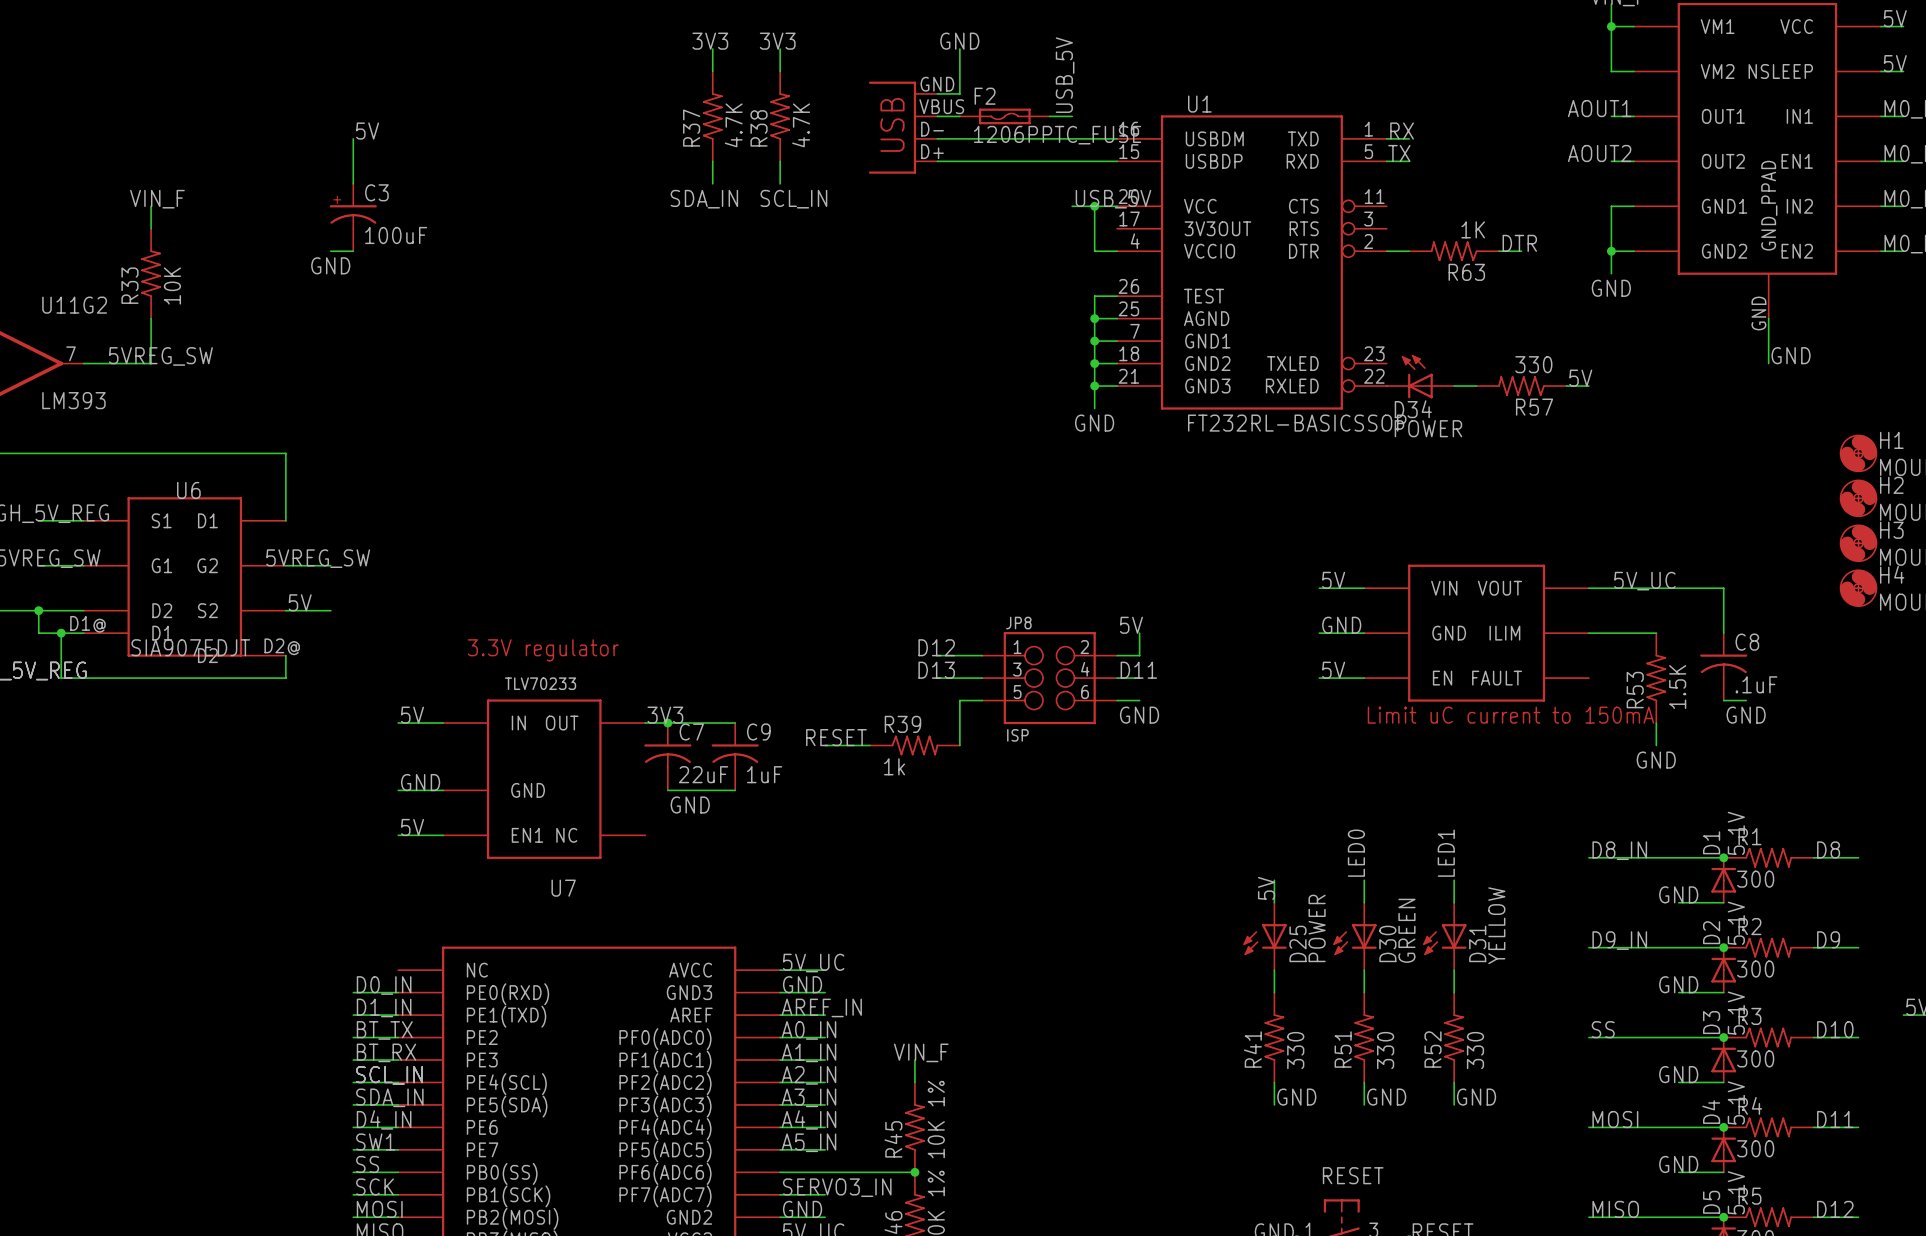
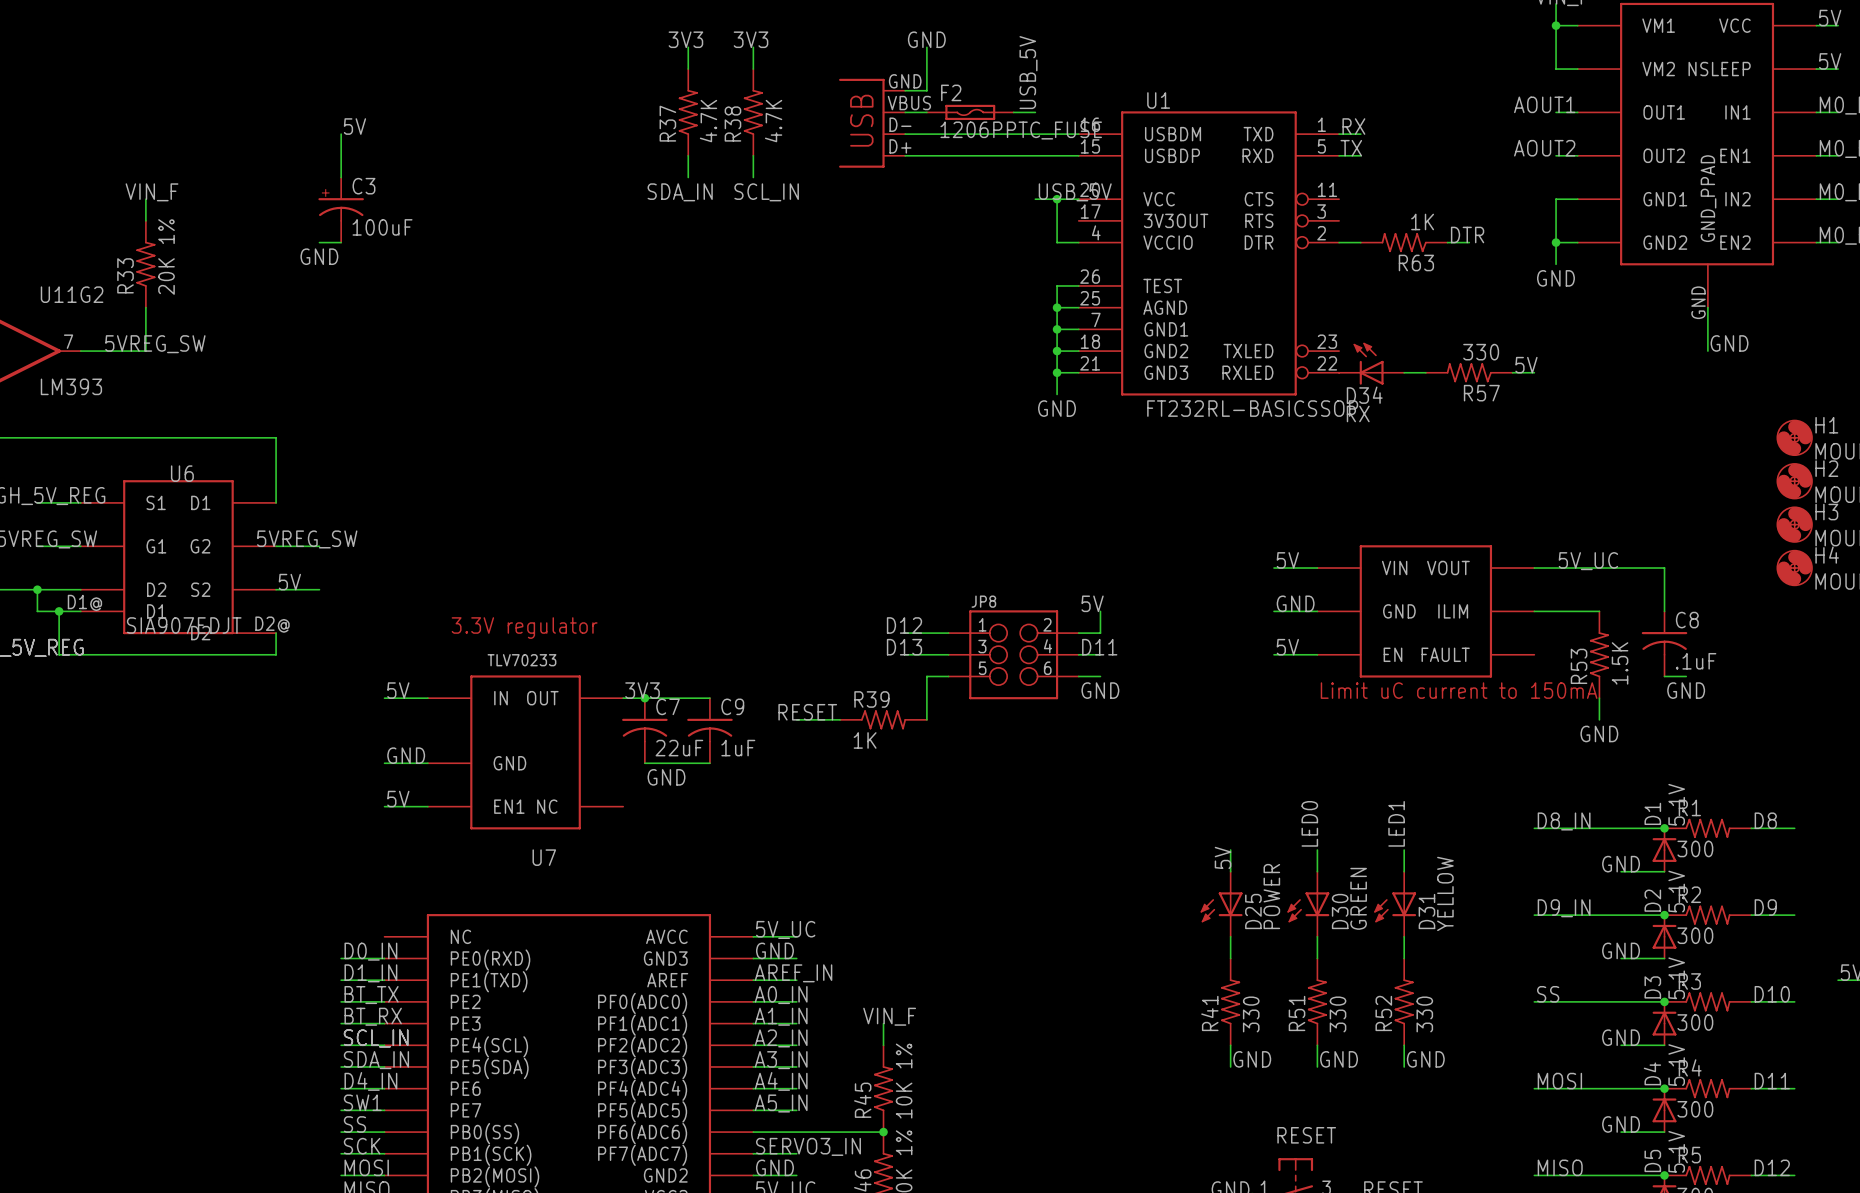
R33 value: 10K (172, 286) -> 20K 1% (166, 256)
D34 value: POWER (1428, 428) -> RX (1358, 413)
JP8 value: ISP (1017, 735) -> none
R39 value: 1k (894, 766) -> 1K (865, 740)

